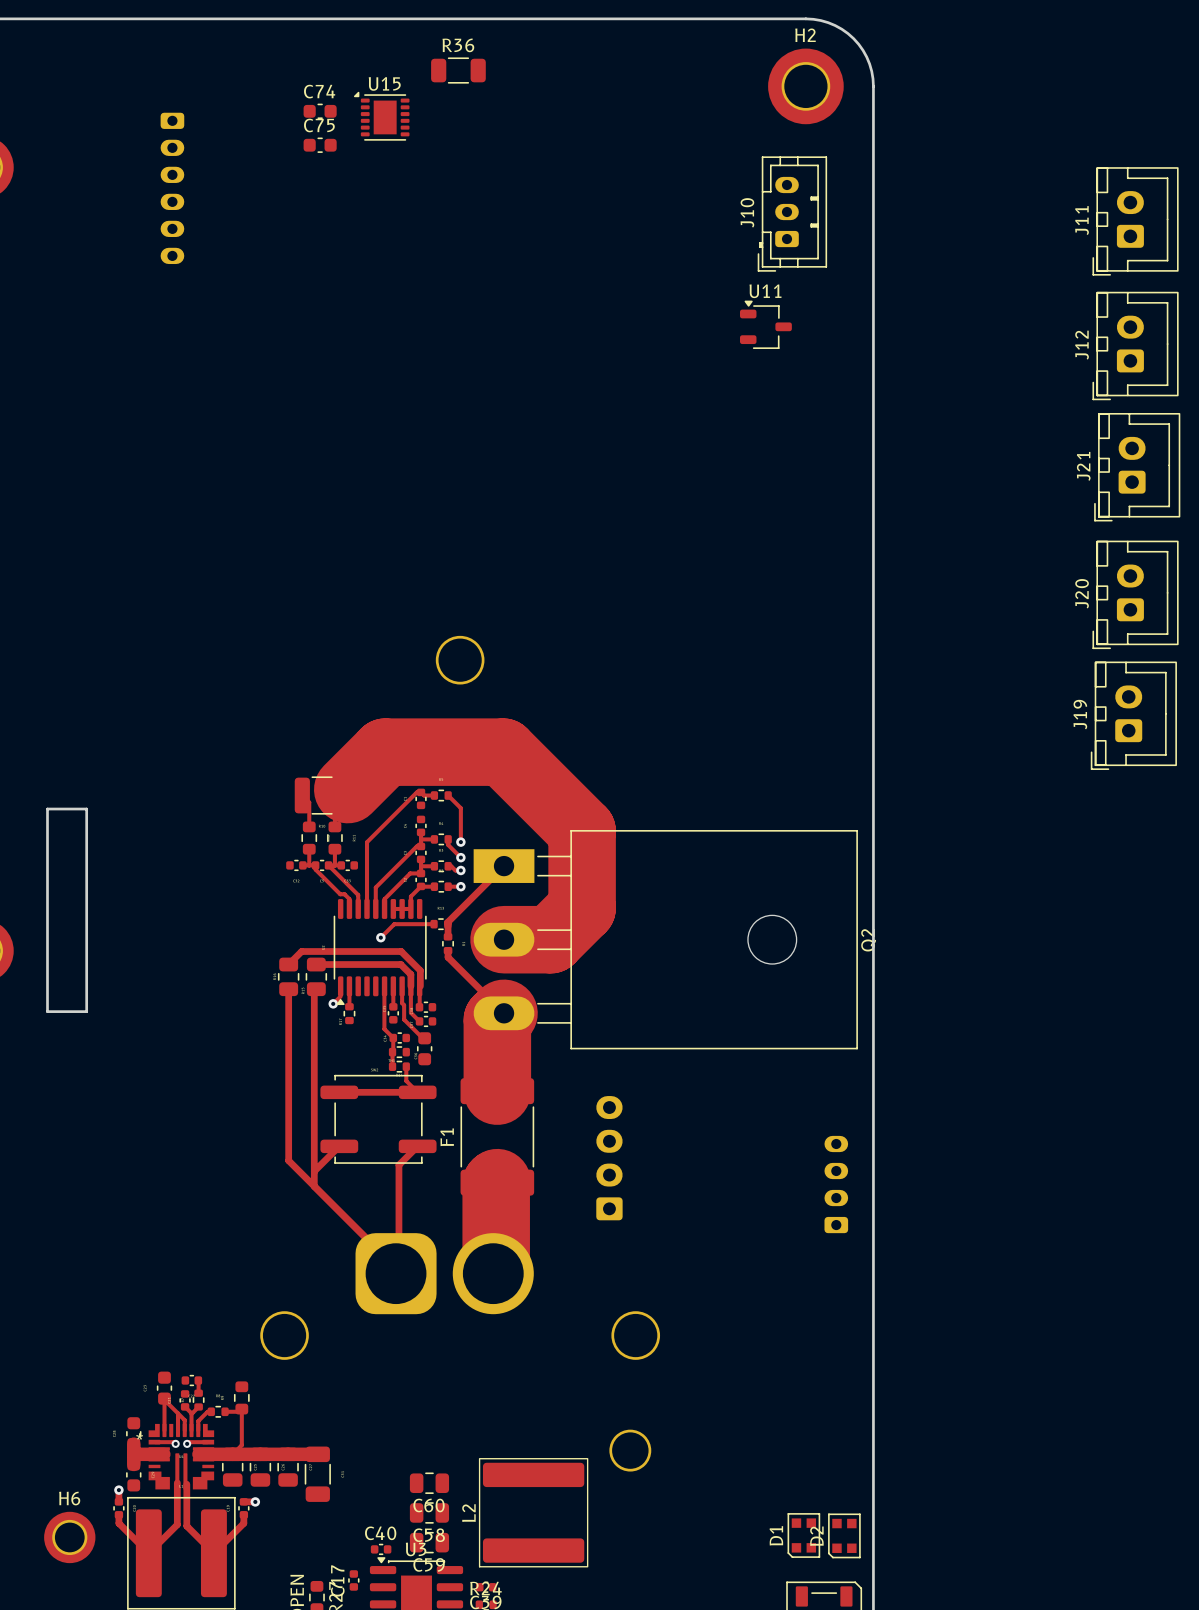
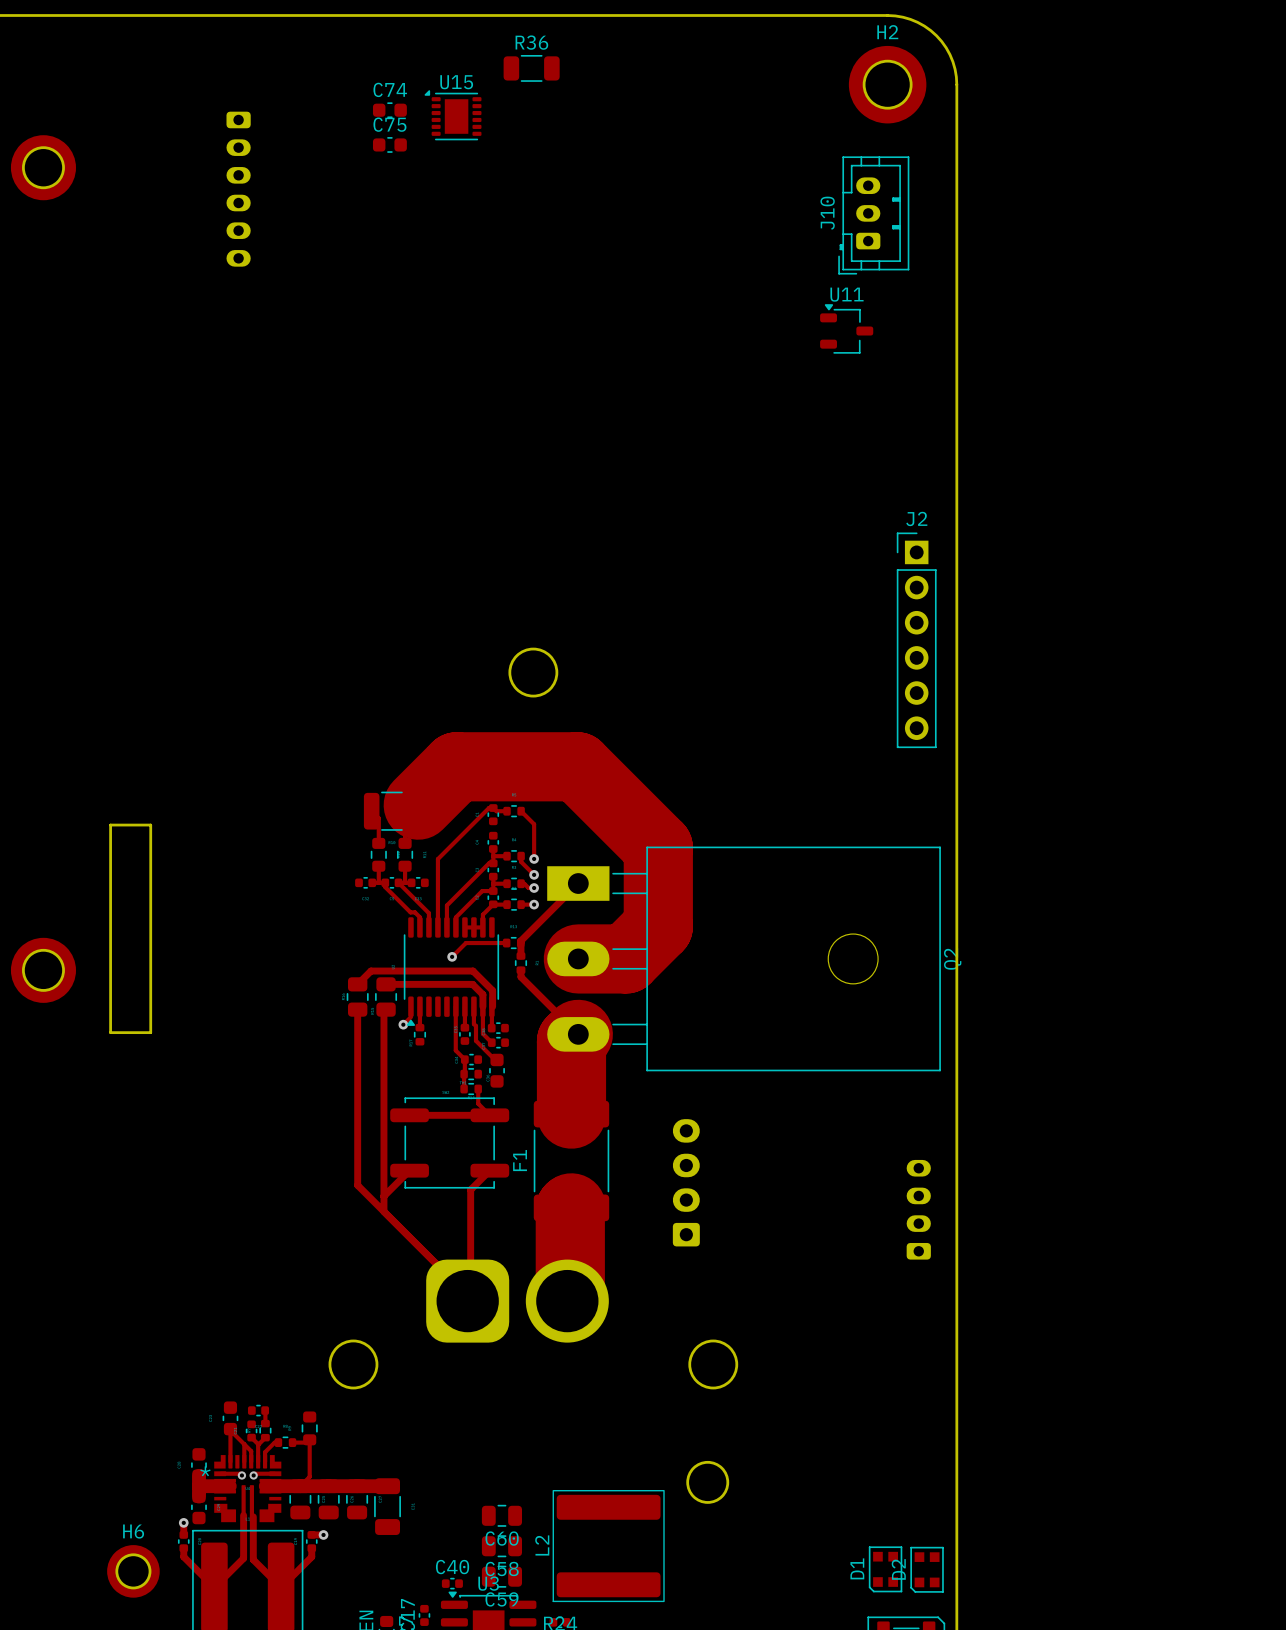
J11: (1135, 221) -> none
J12: (1135, 346) -> none
J21: (1137, 467) -> none
J20: (1135, 594) -> none
J2: none -> (916, 640)
J19: (1133, 715) -> none

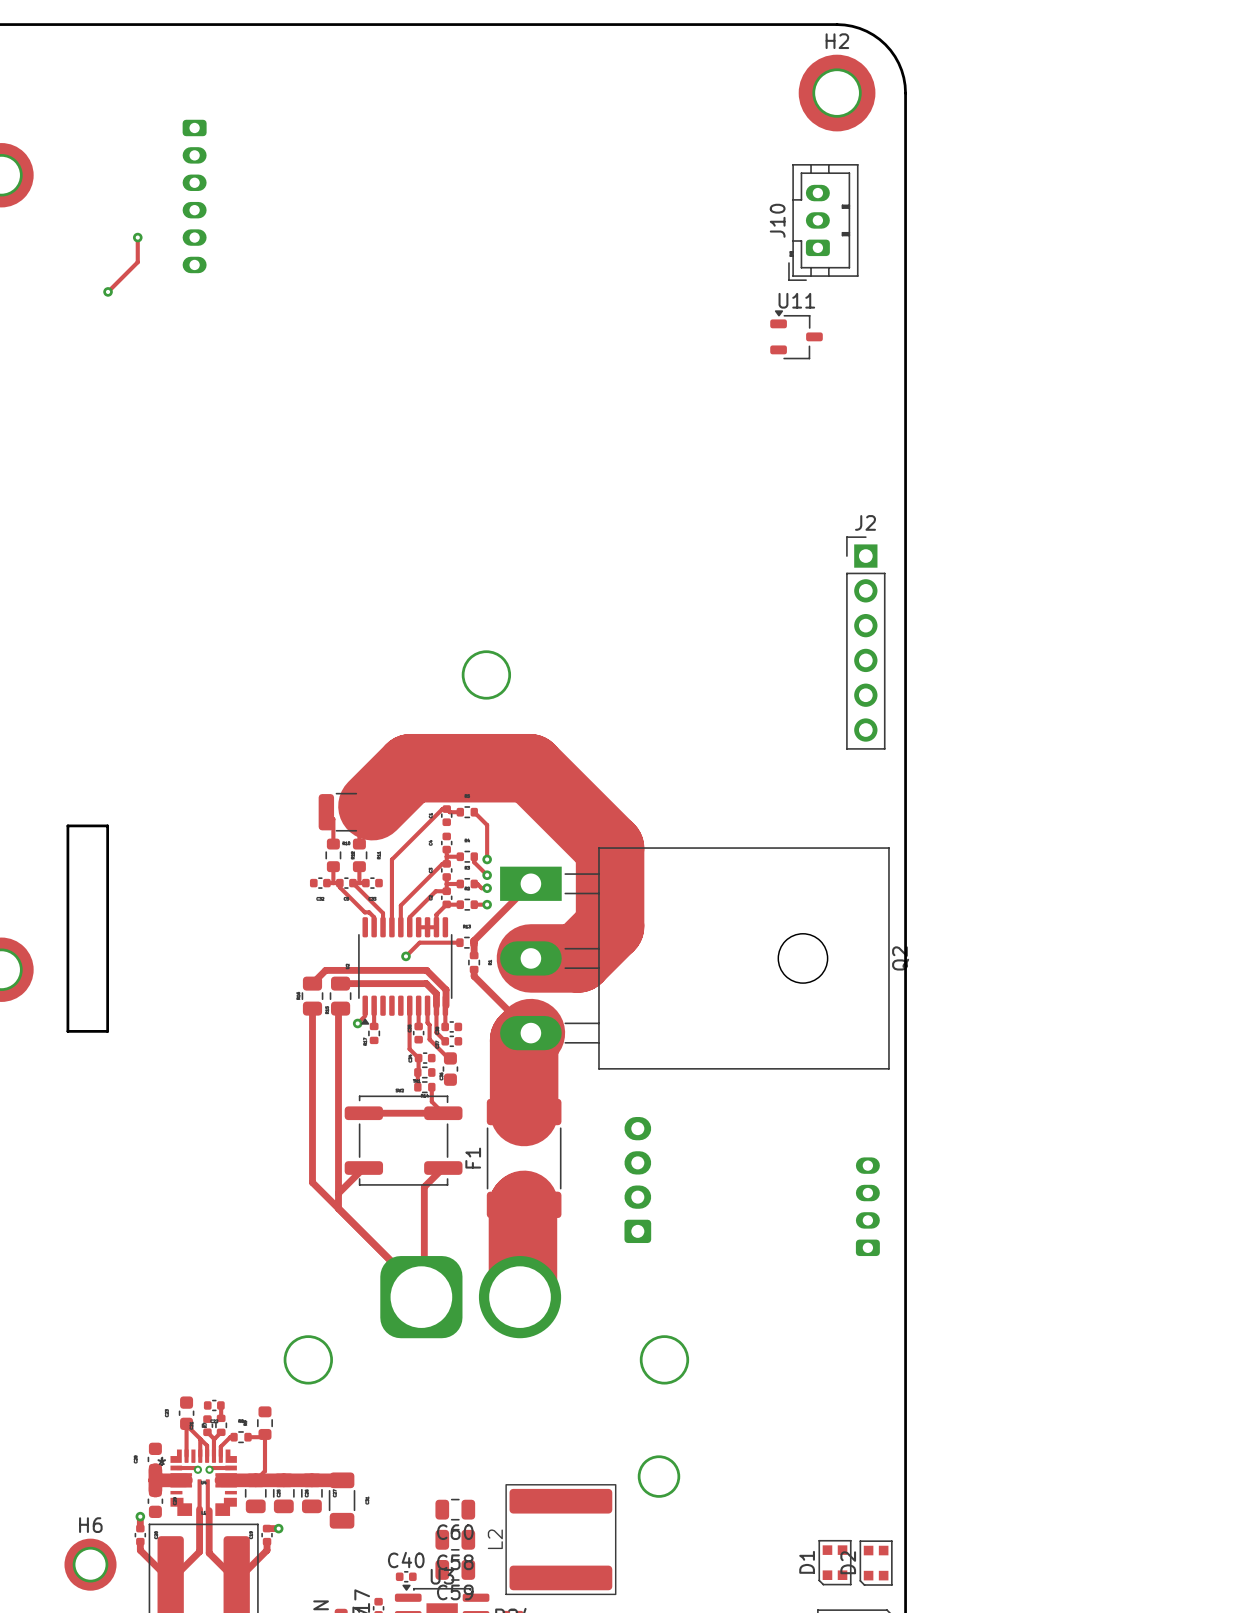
R36: (531, 68) -> none
C74: (389, 110) -> none
U15: (453, 115) -> none
C75: (389, 144) -> none
track: none -> (137, 237) (137, 262) (108, 291)
via: none -> (137, 237)
via: none -> (108, 291)

